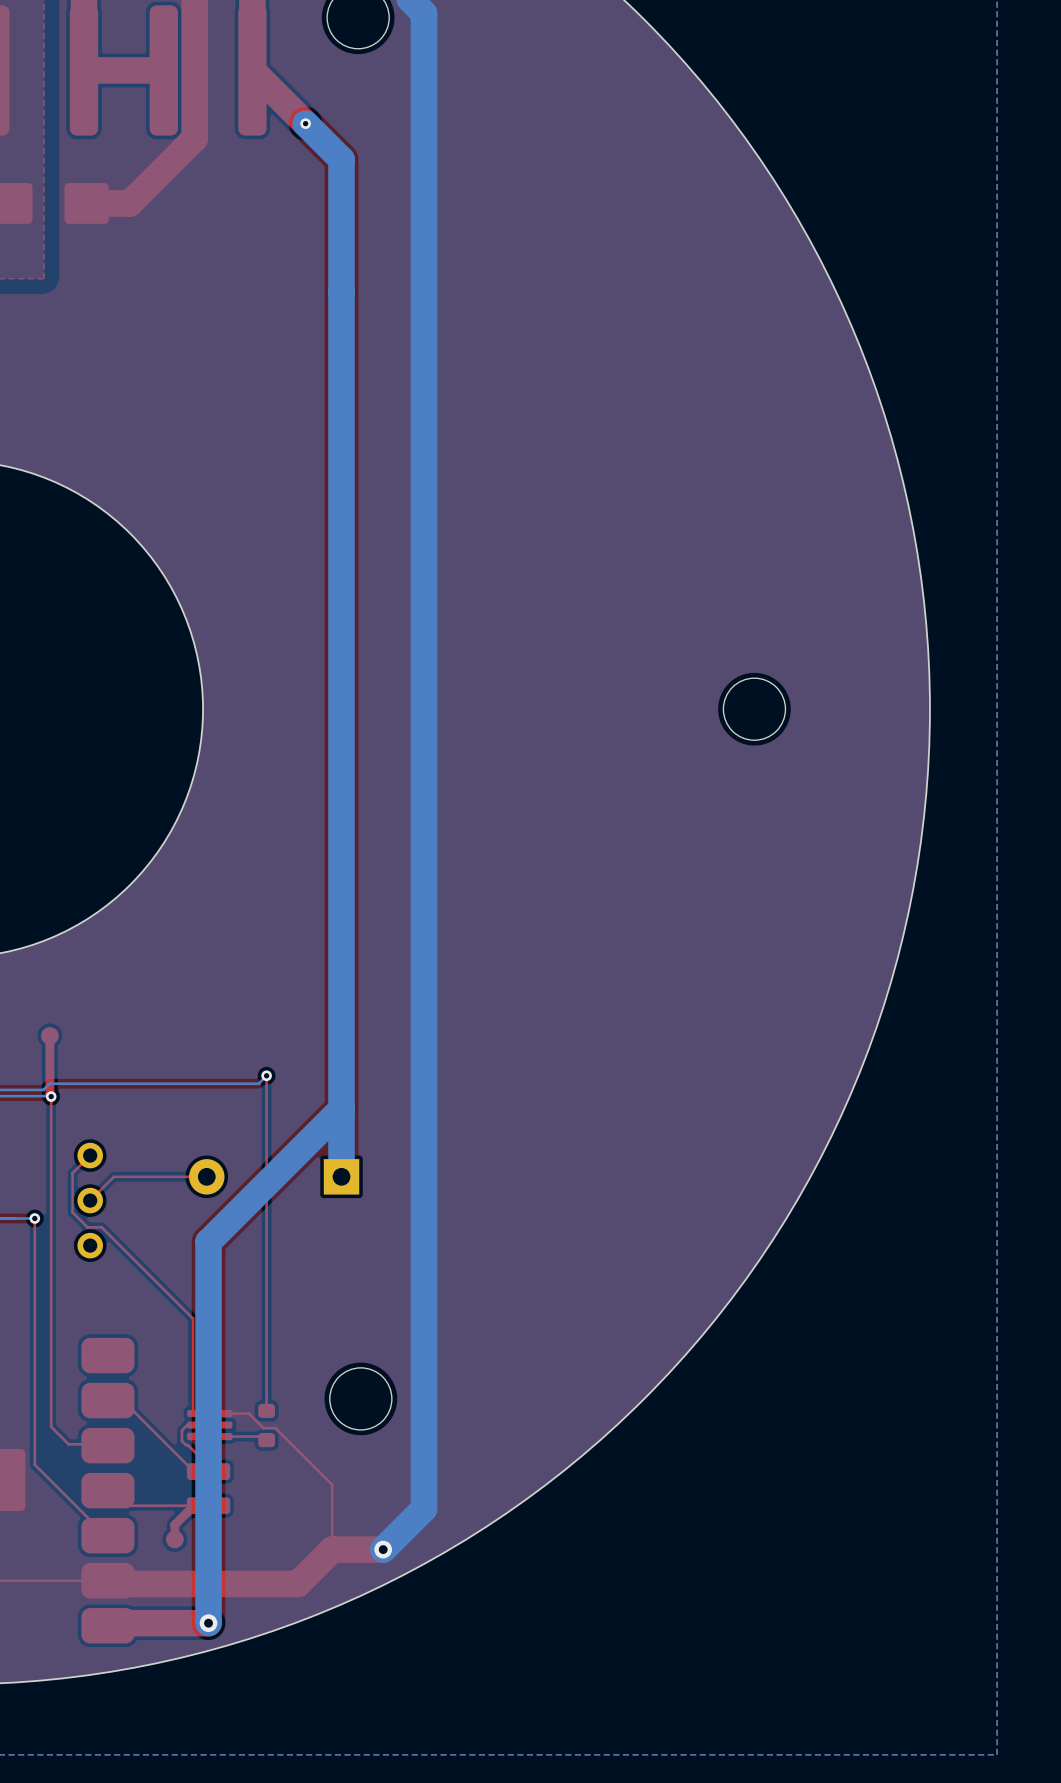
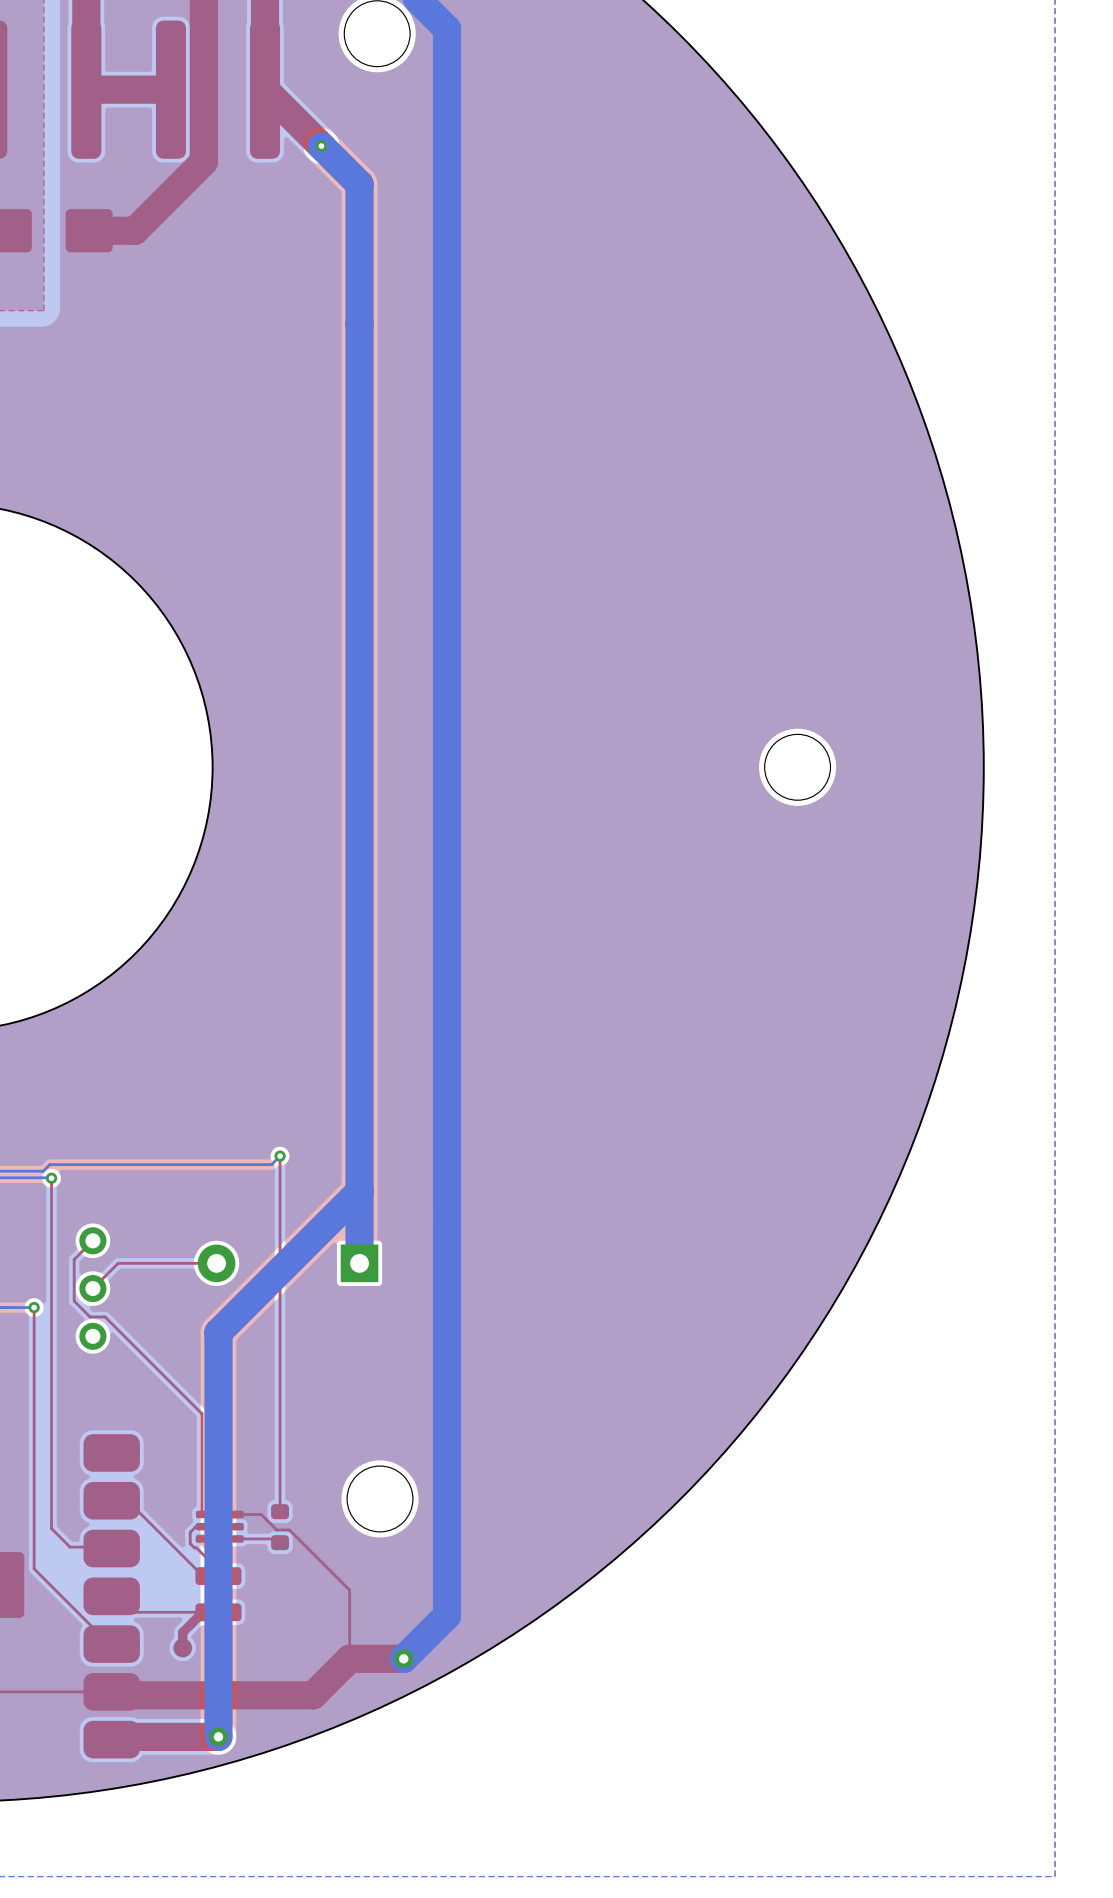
top track: (49, 1035) (51, 1096) -> none
part: (49, 1035) -> none

